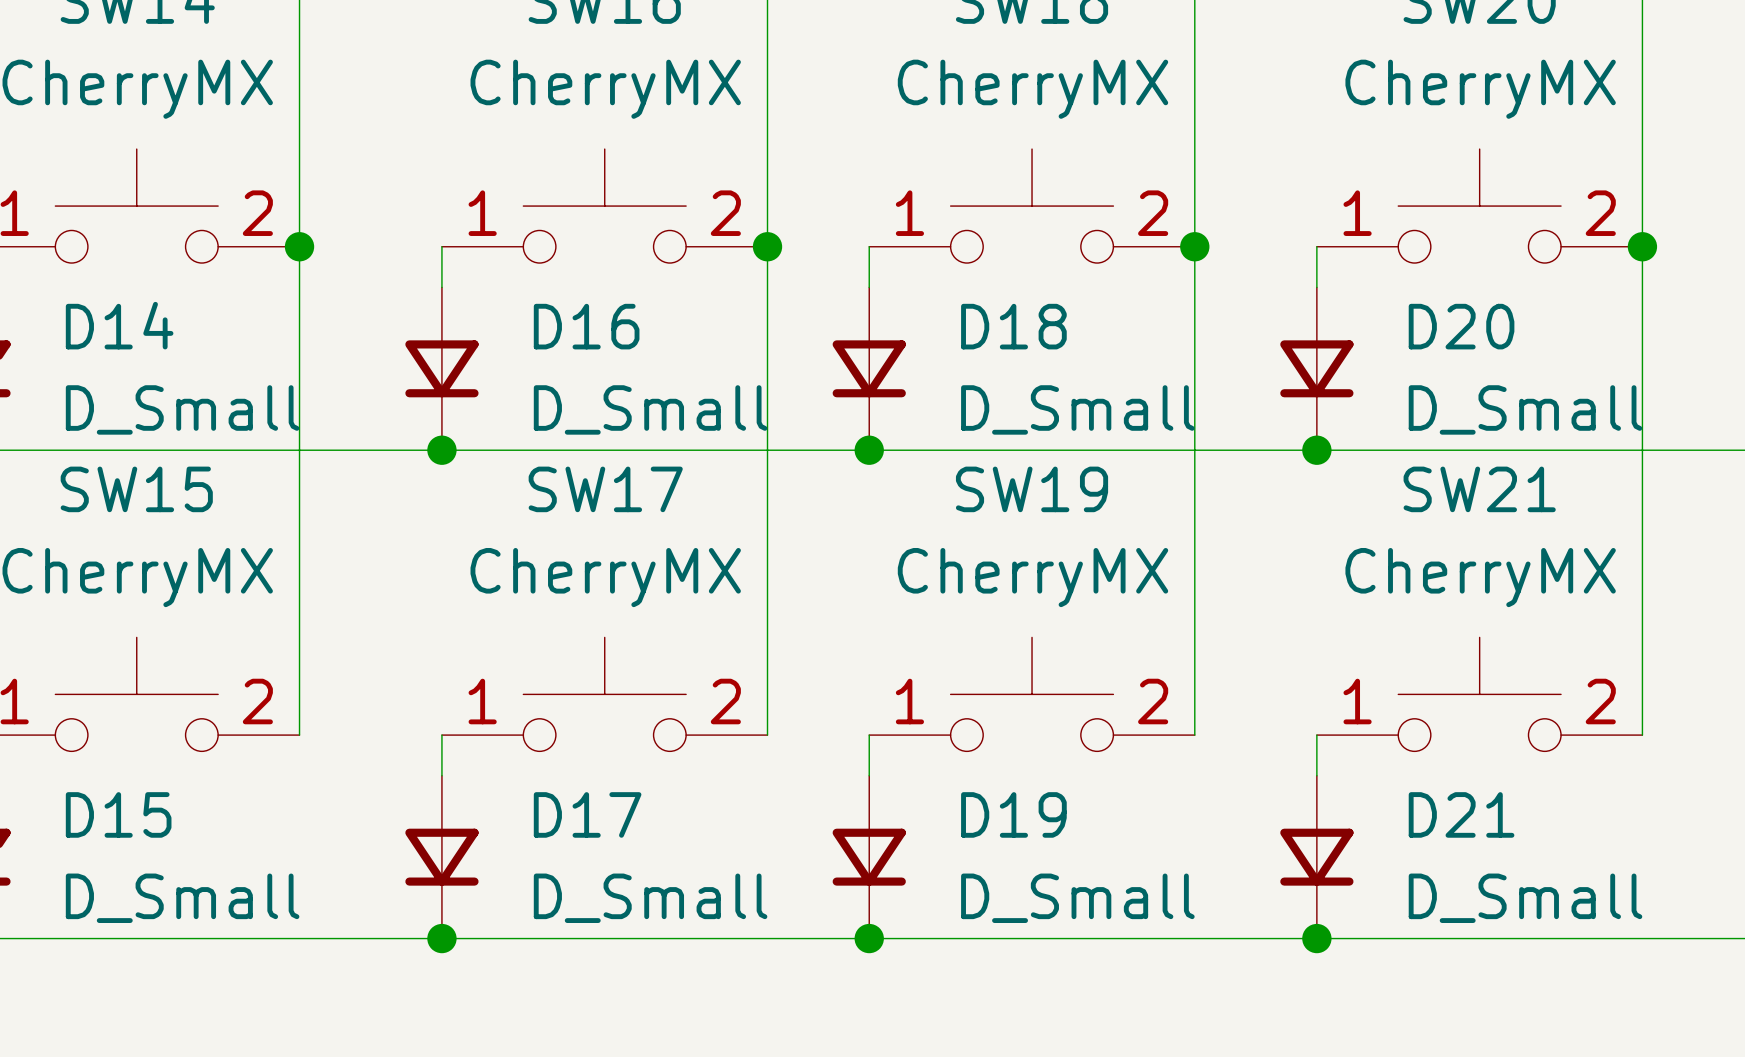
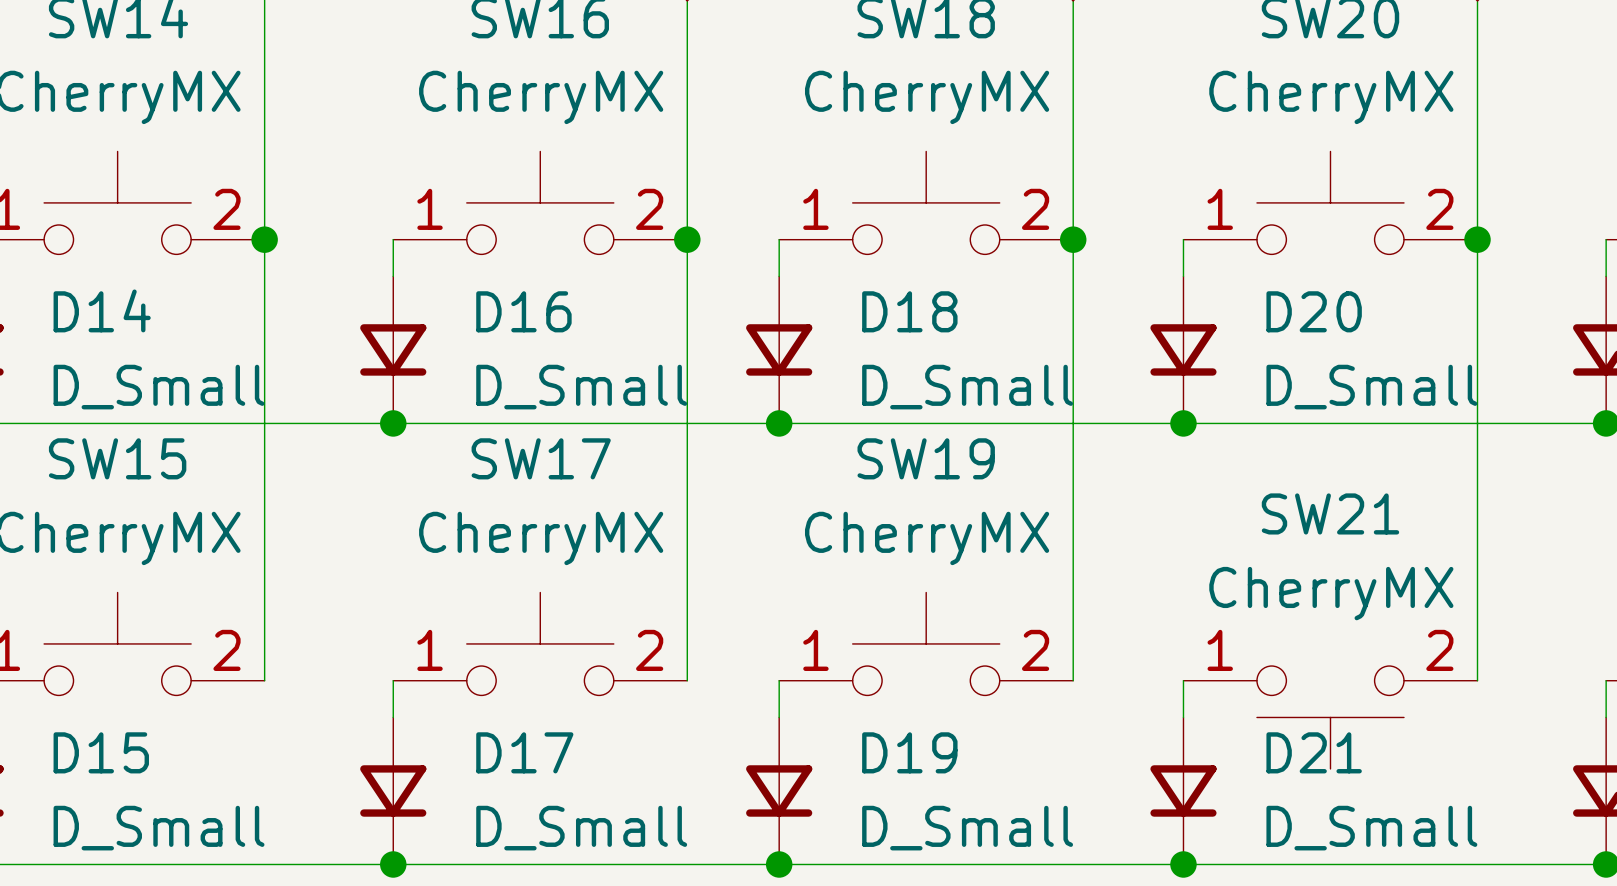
SW21 flip: as is (1479, 694) -> up-down (1330, 717)

